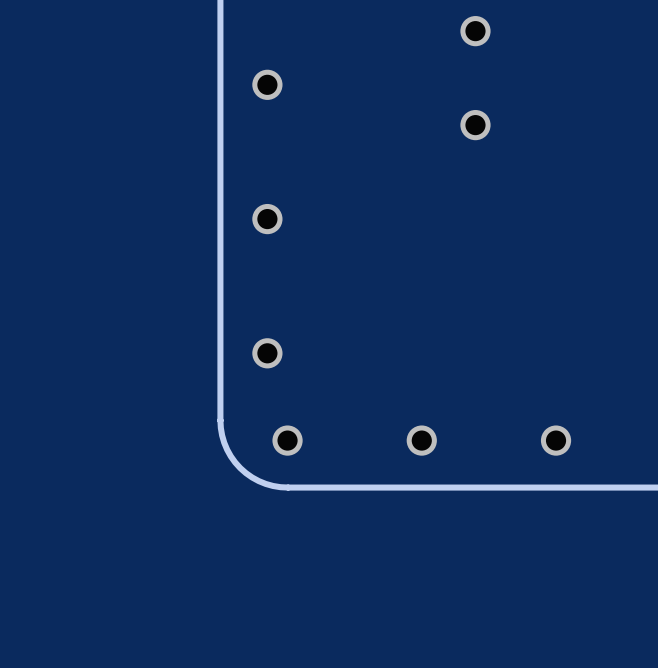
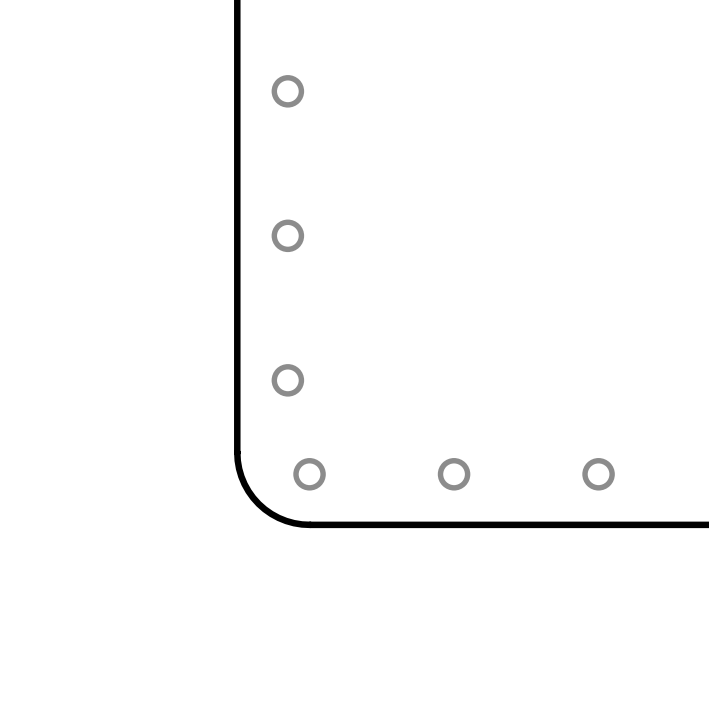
via: (475, 31) -> none
via: (475, 125) -> none

